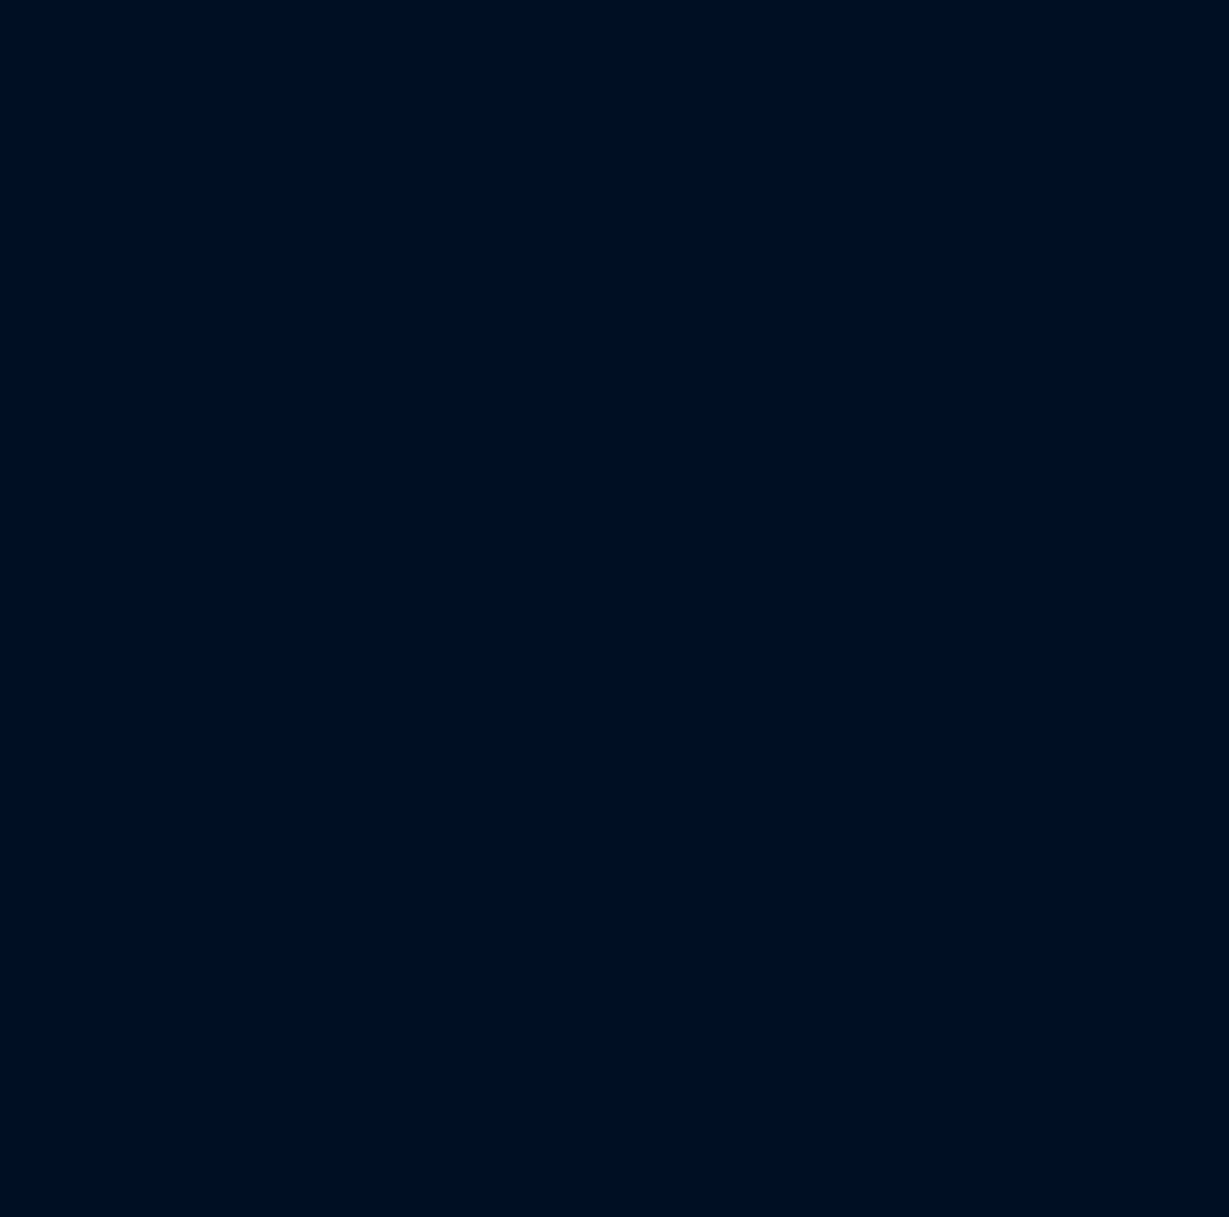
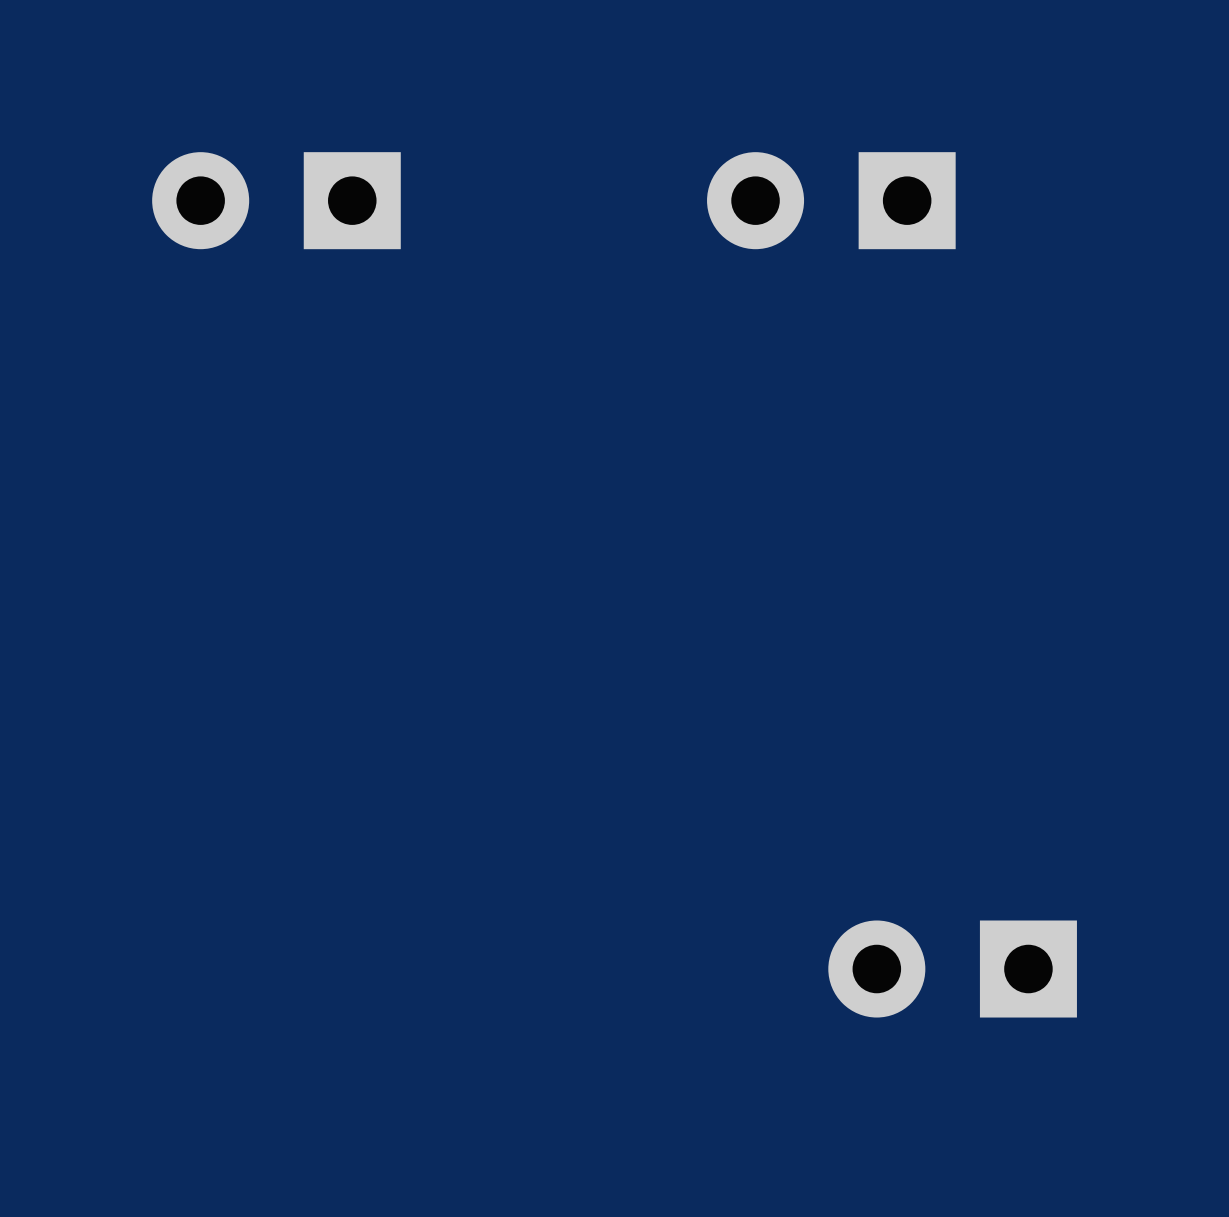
part: none -> (276, 200)
part: none -> (831, 200)
part: none -> (952, 969)

